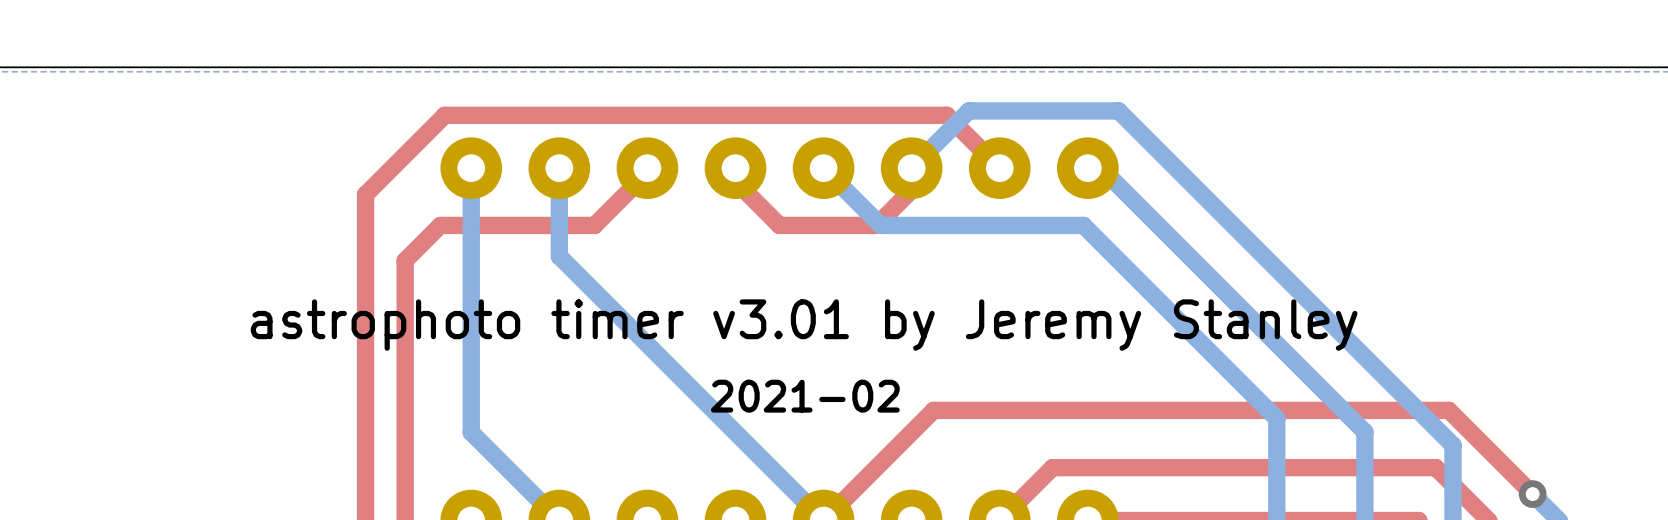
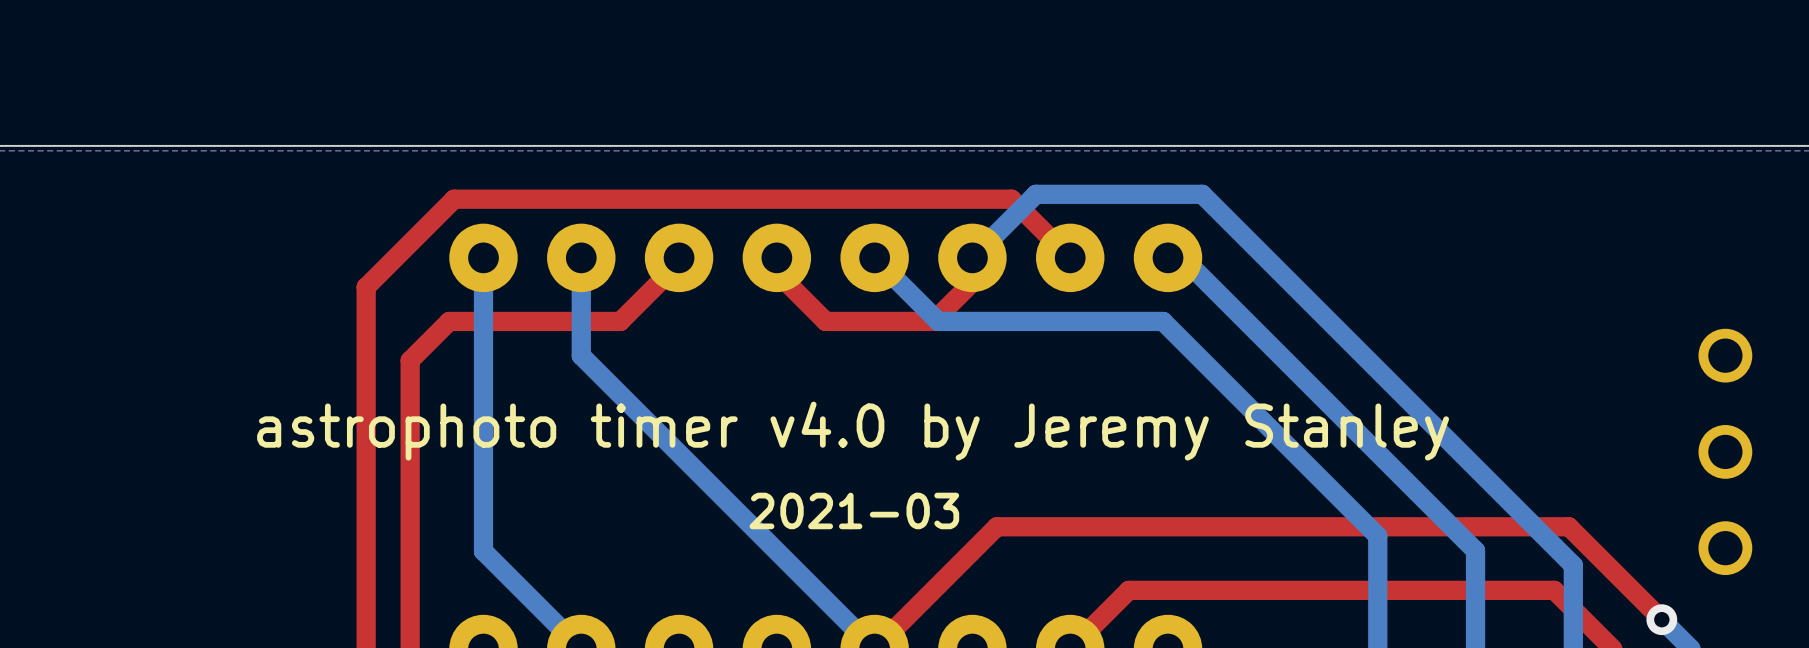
text: astrophoto timer v3.01 by Jeremy Stanley (804, 325) -> astrophoto timer v4.0 by Jeremy Stanley (853, 431)
part: none -> (1725, 451)
text: 2021-02 (805, 396) -> 2021-03 (854, 510)

